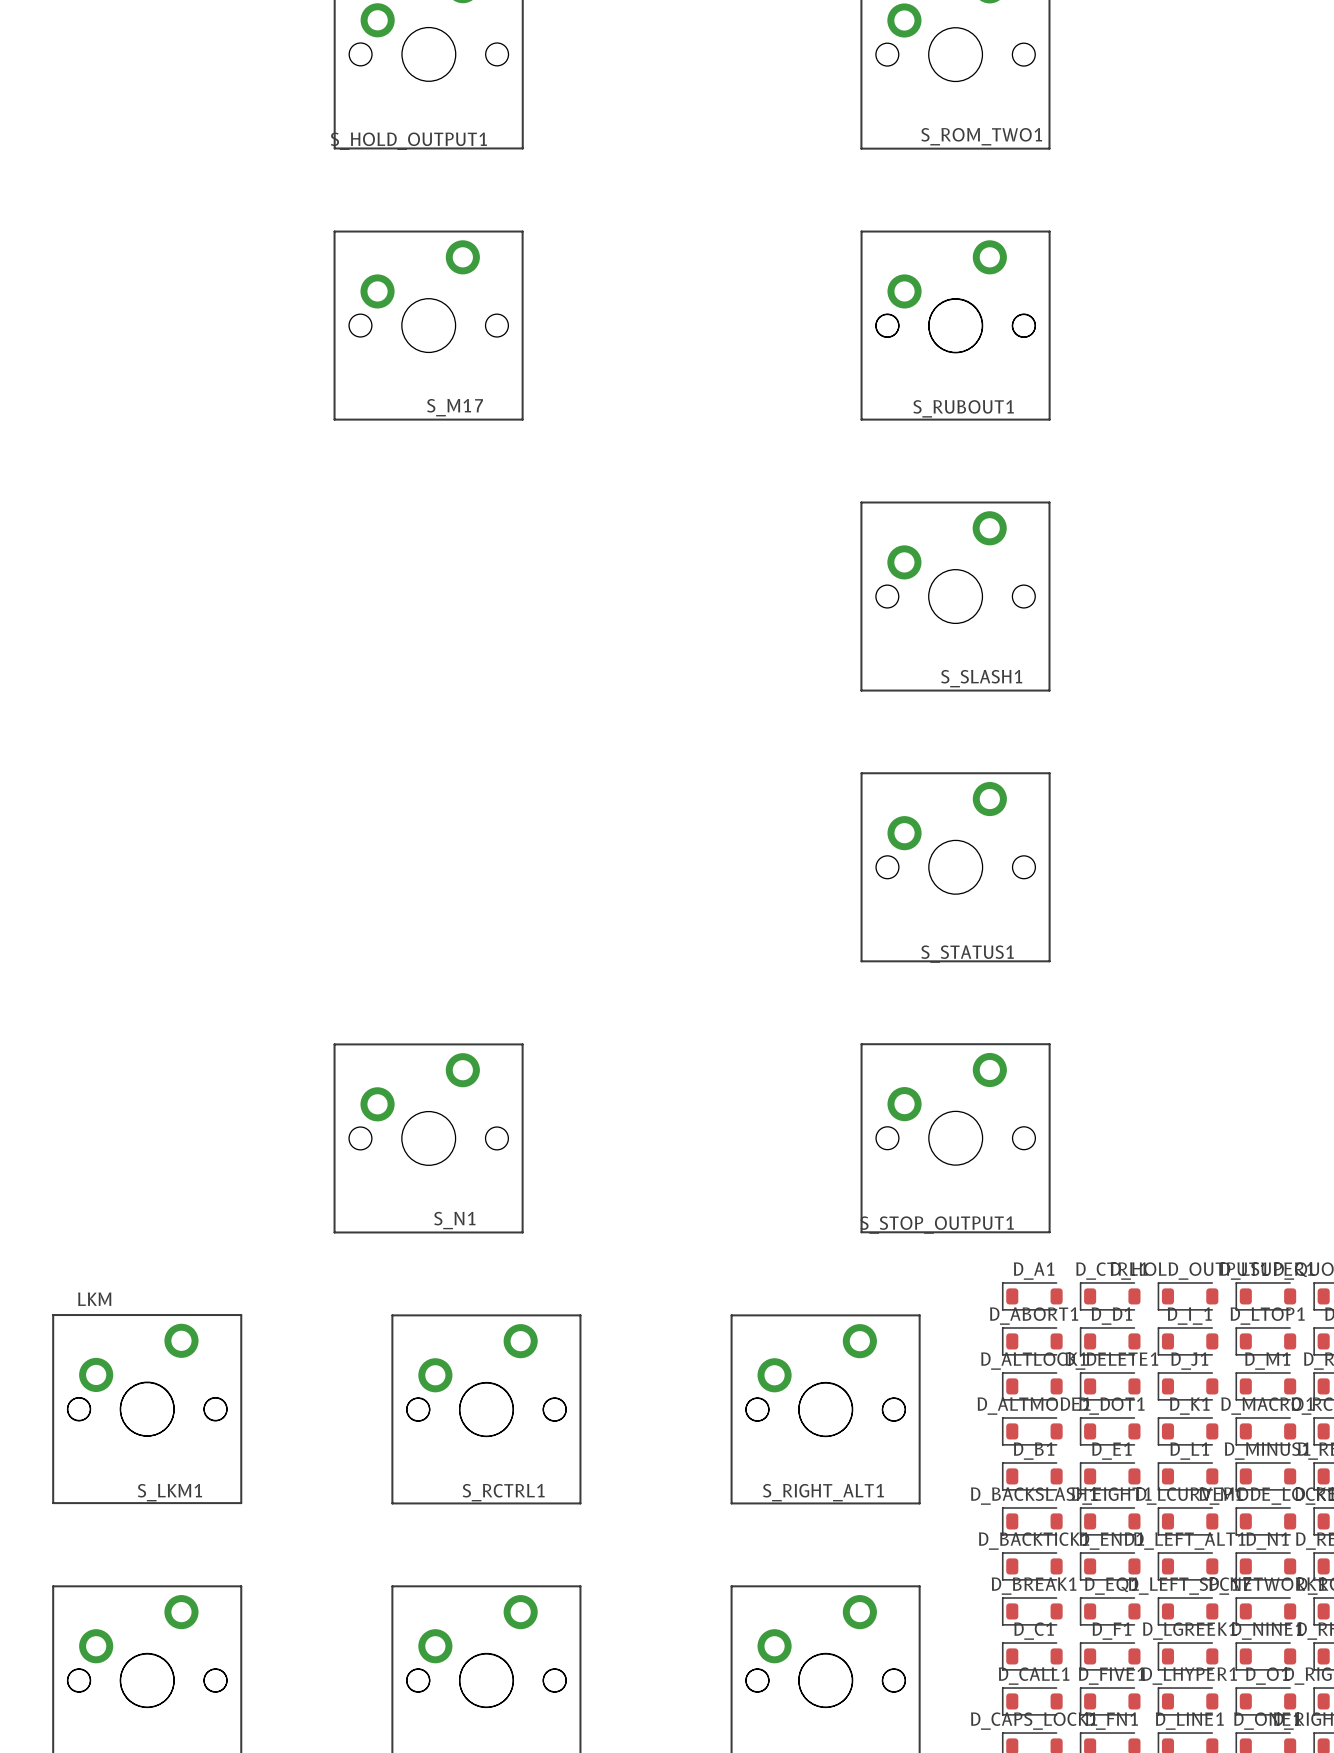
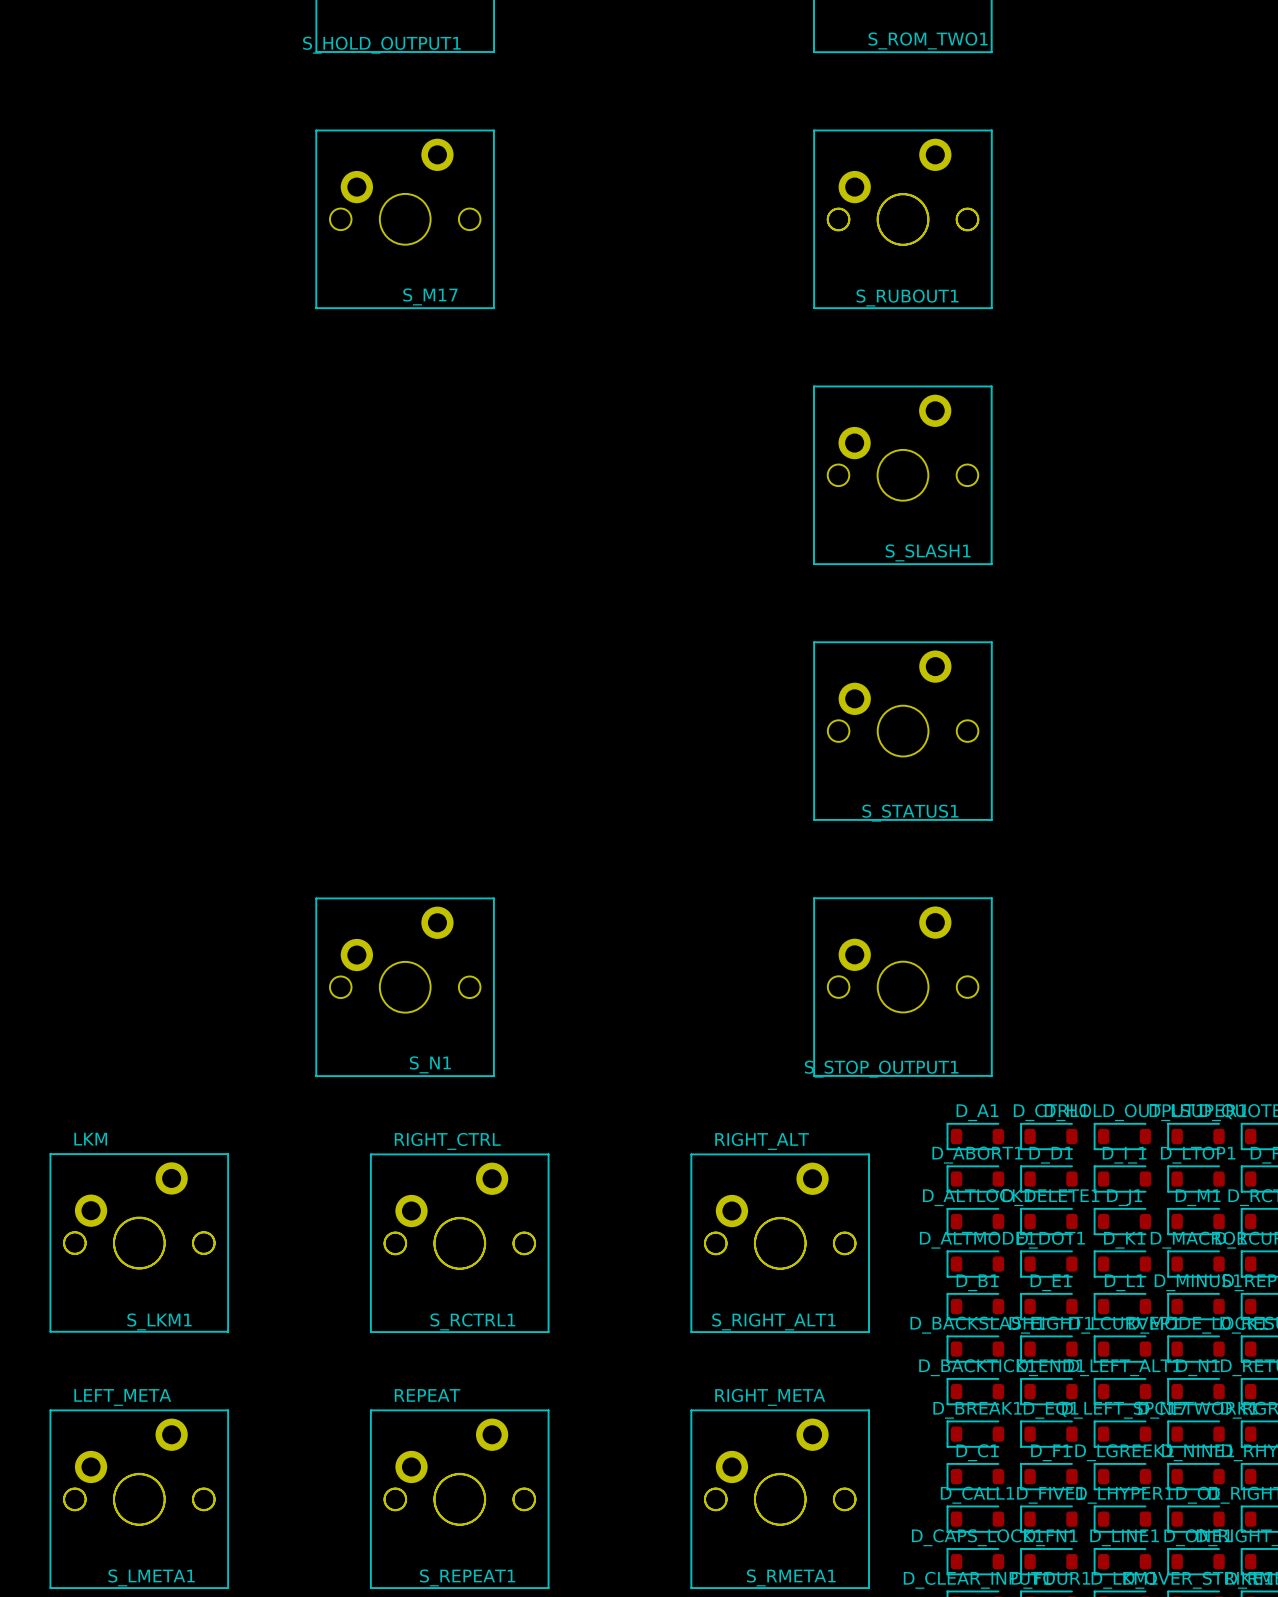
S_RCTRL1 value: none -> RIGHT_CTRL (447, 1141)
S_RIGHT_ALT1 value: none -> RIGHT_ALT (762, 1141)
S_REPEAT1 value: none -> REPEAT (427, 1395)
S_LMETA1 value: none -> LEFT_META (122, 1397)
S_RMETA1 value: none -> RIGHT_META (770, 1397)

